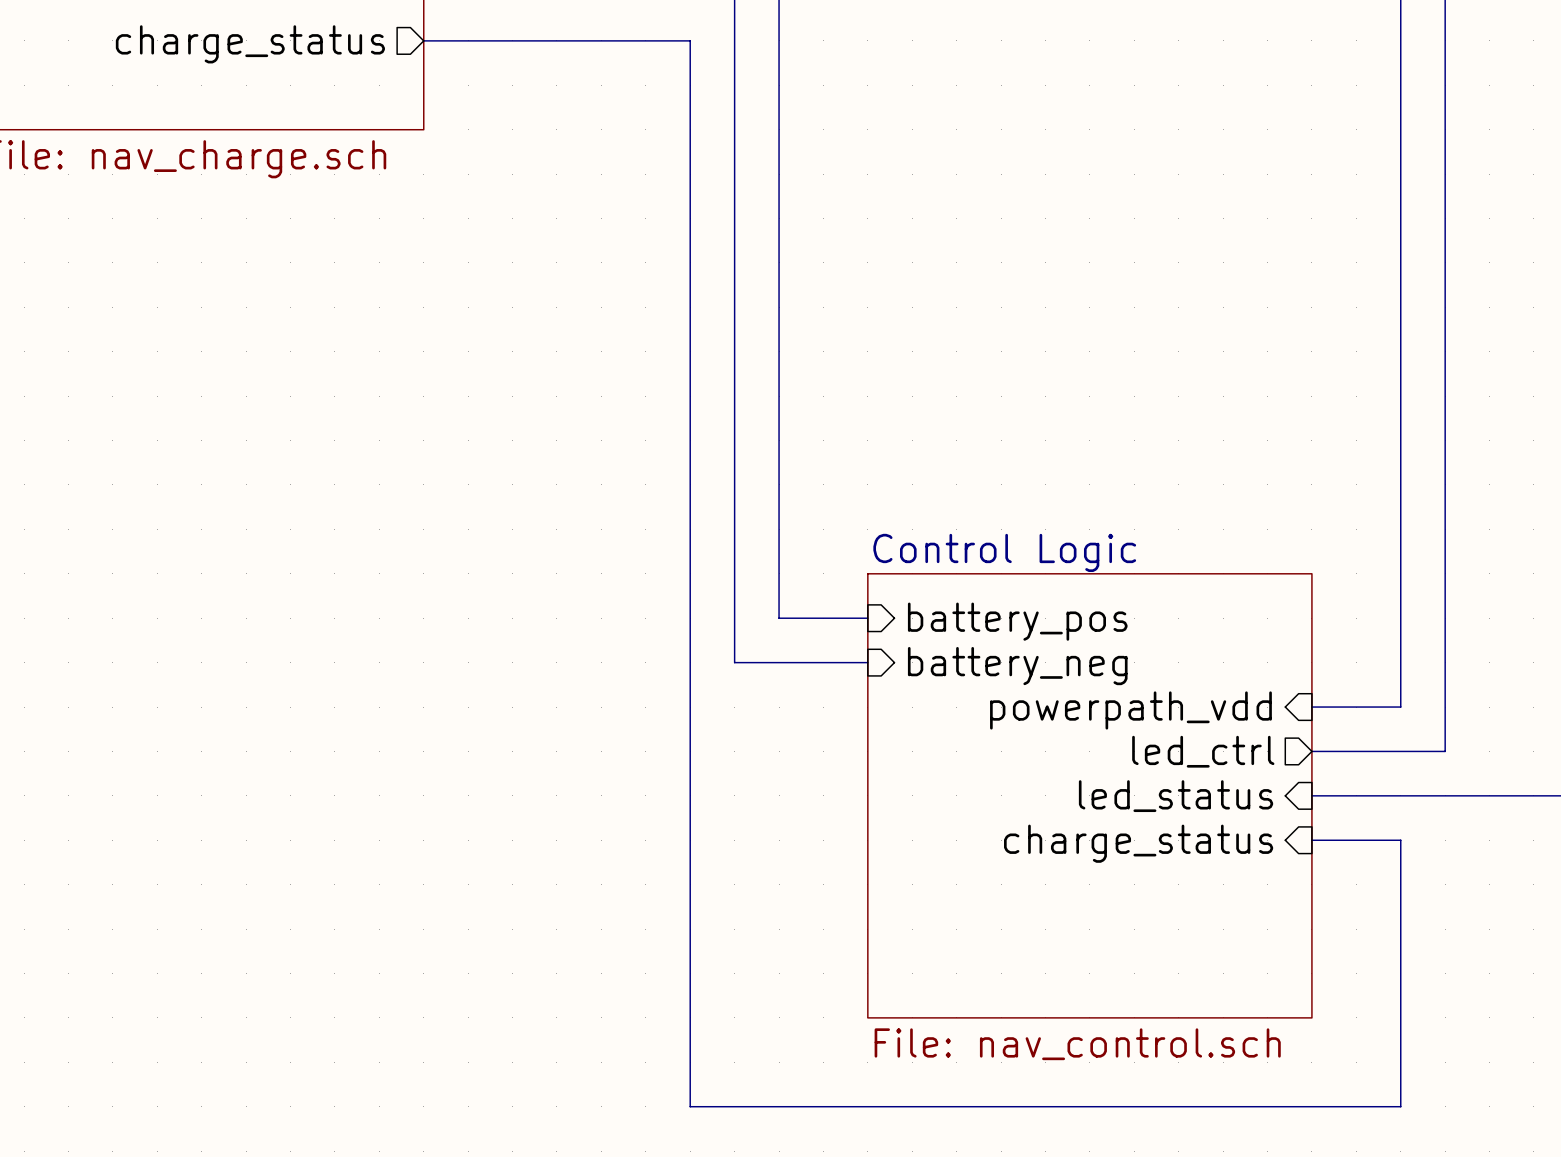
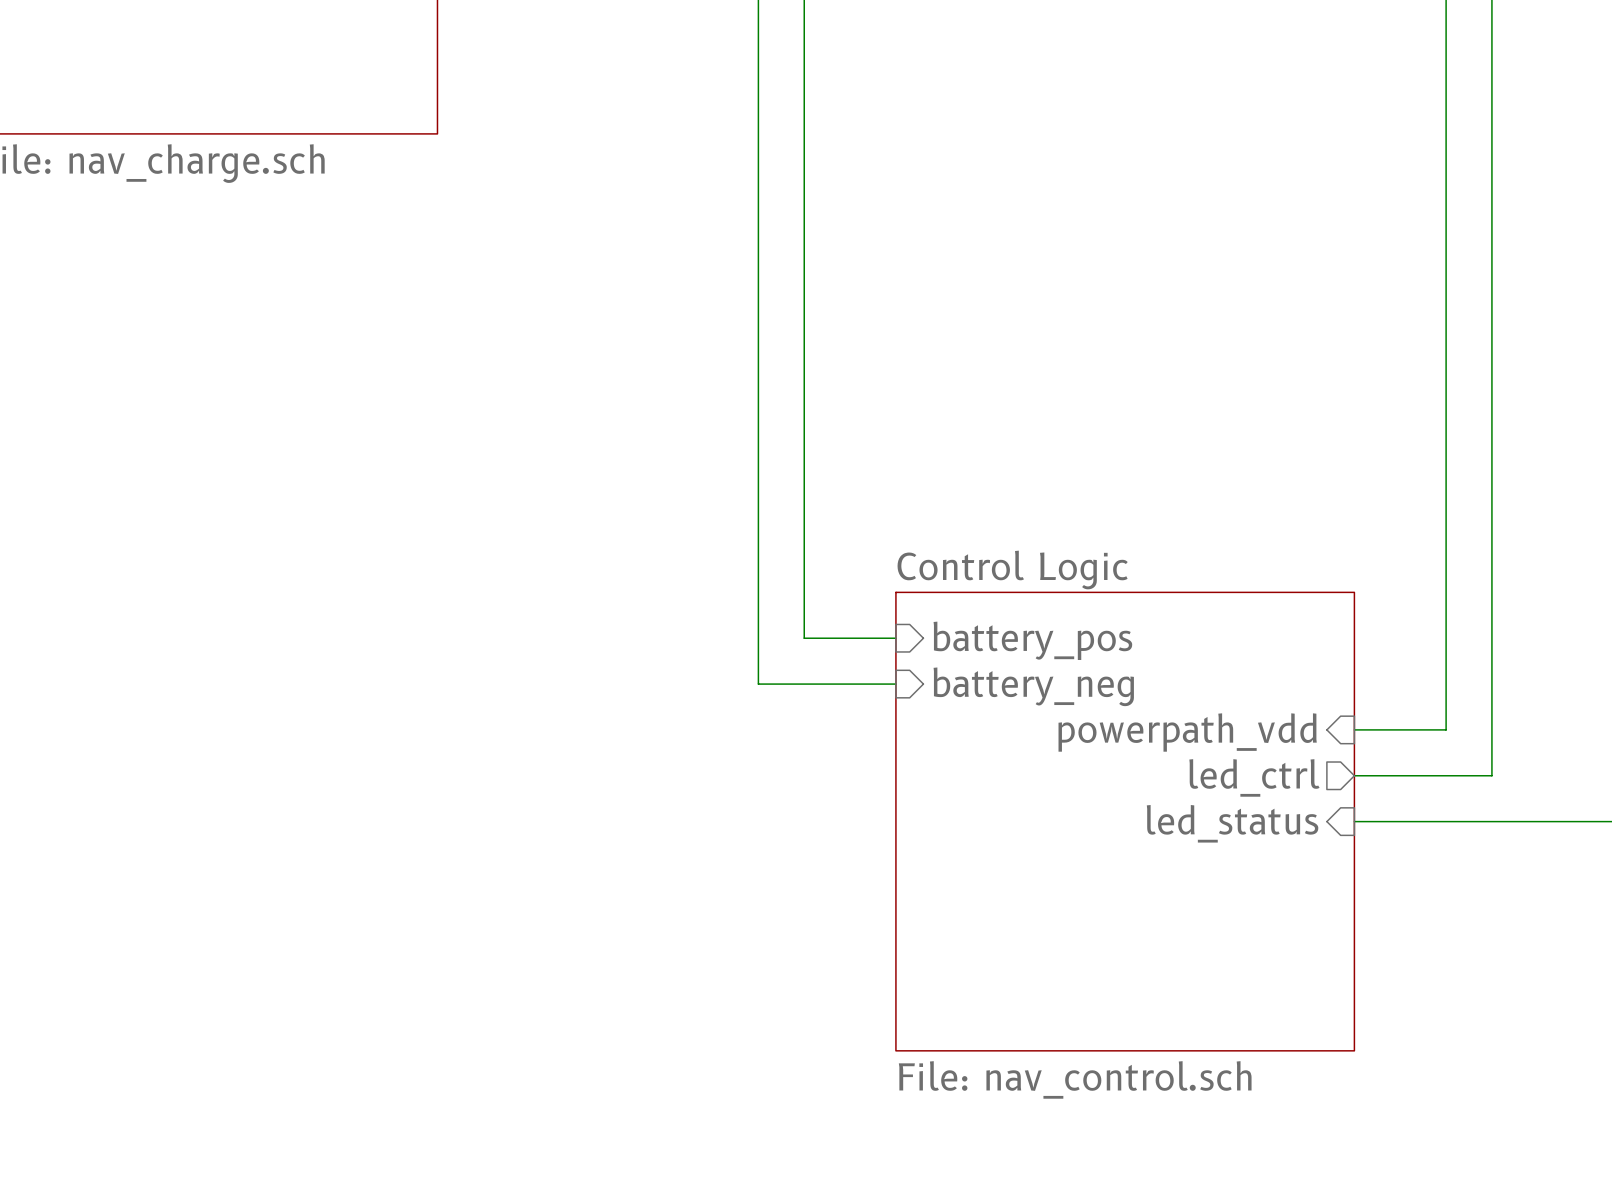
wire: (423, 40) (690, 40) (690, 1106) (1400, 1106) (1400, 840) (1311, 840) -> none
sheet pin: charge_status (250, 44) -> none
sheet pin: charge_status (1138, 843) -> none

